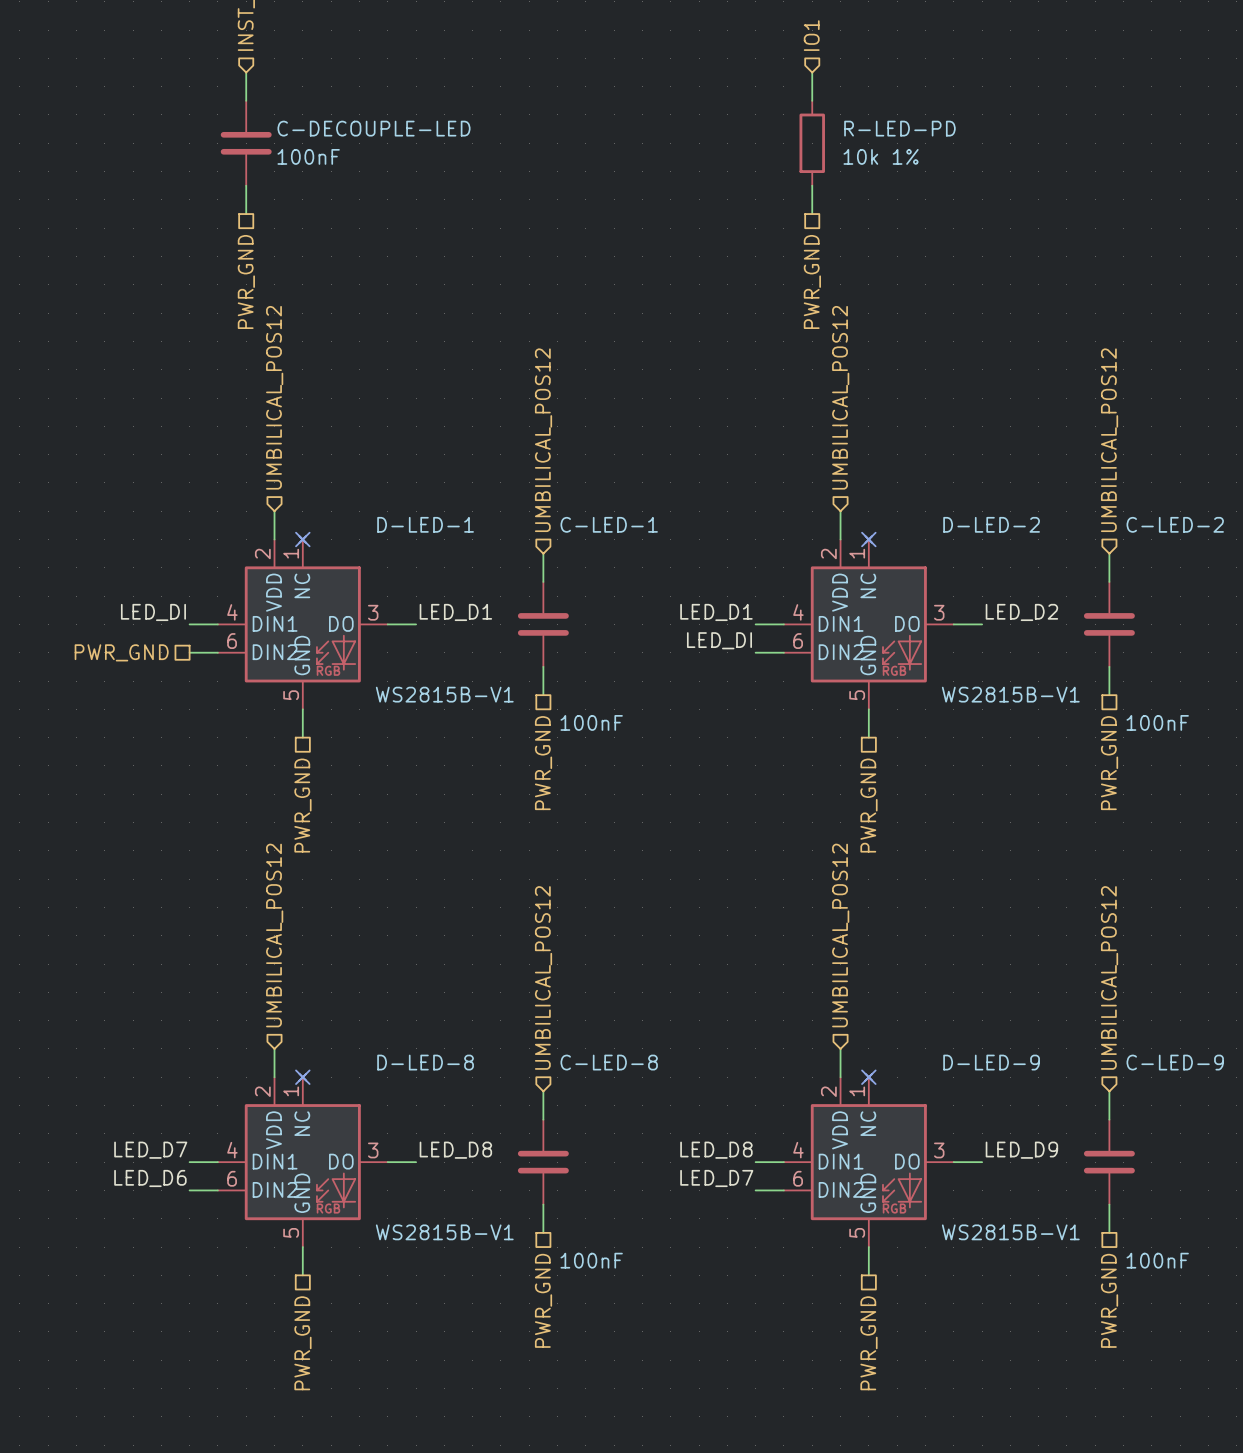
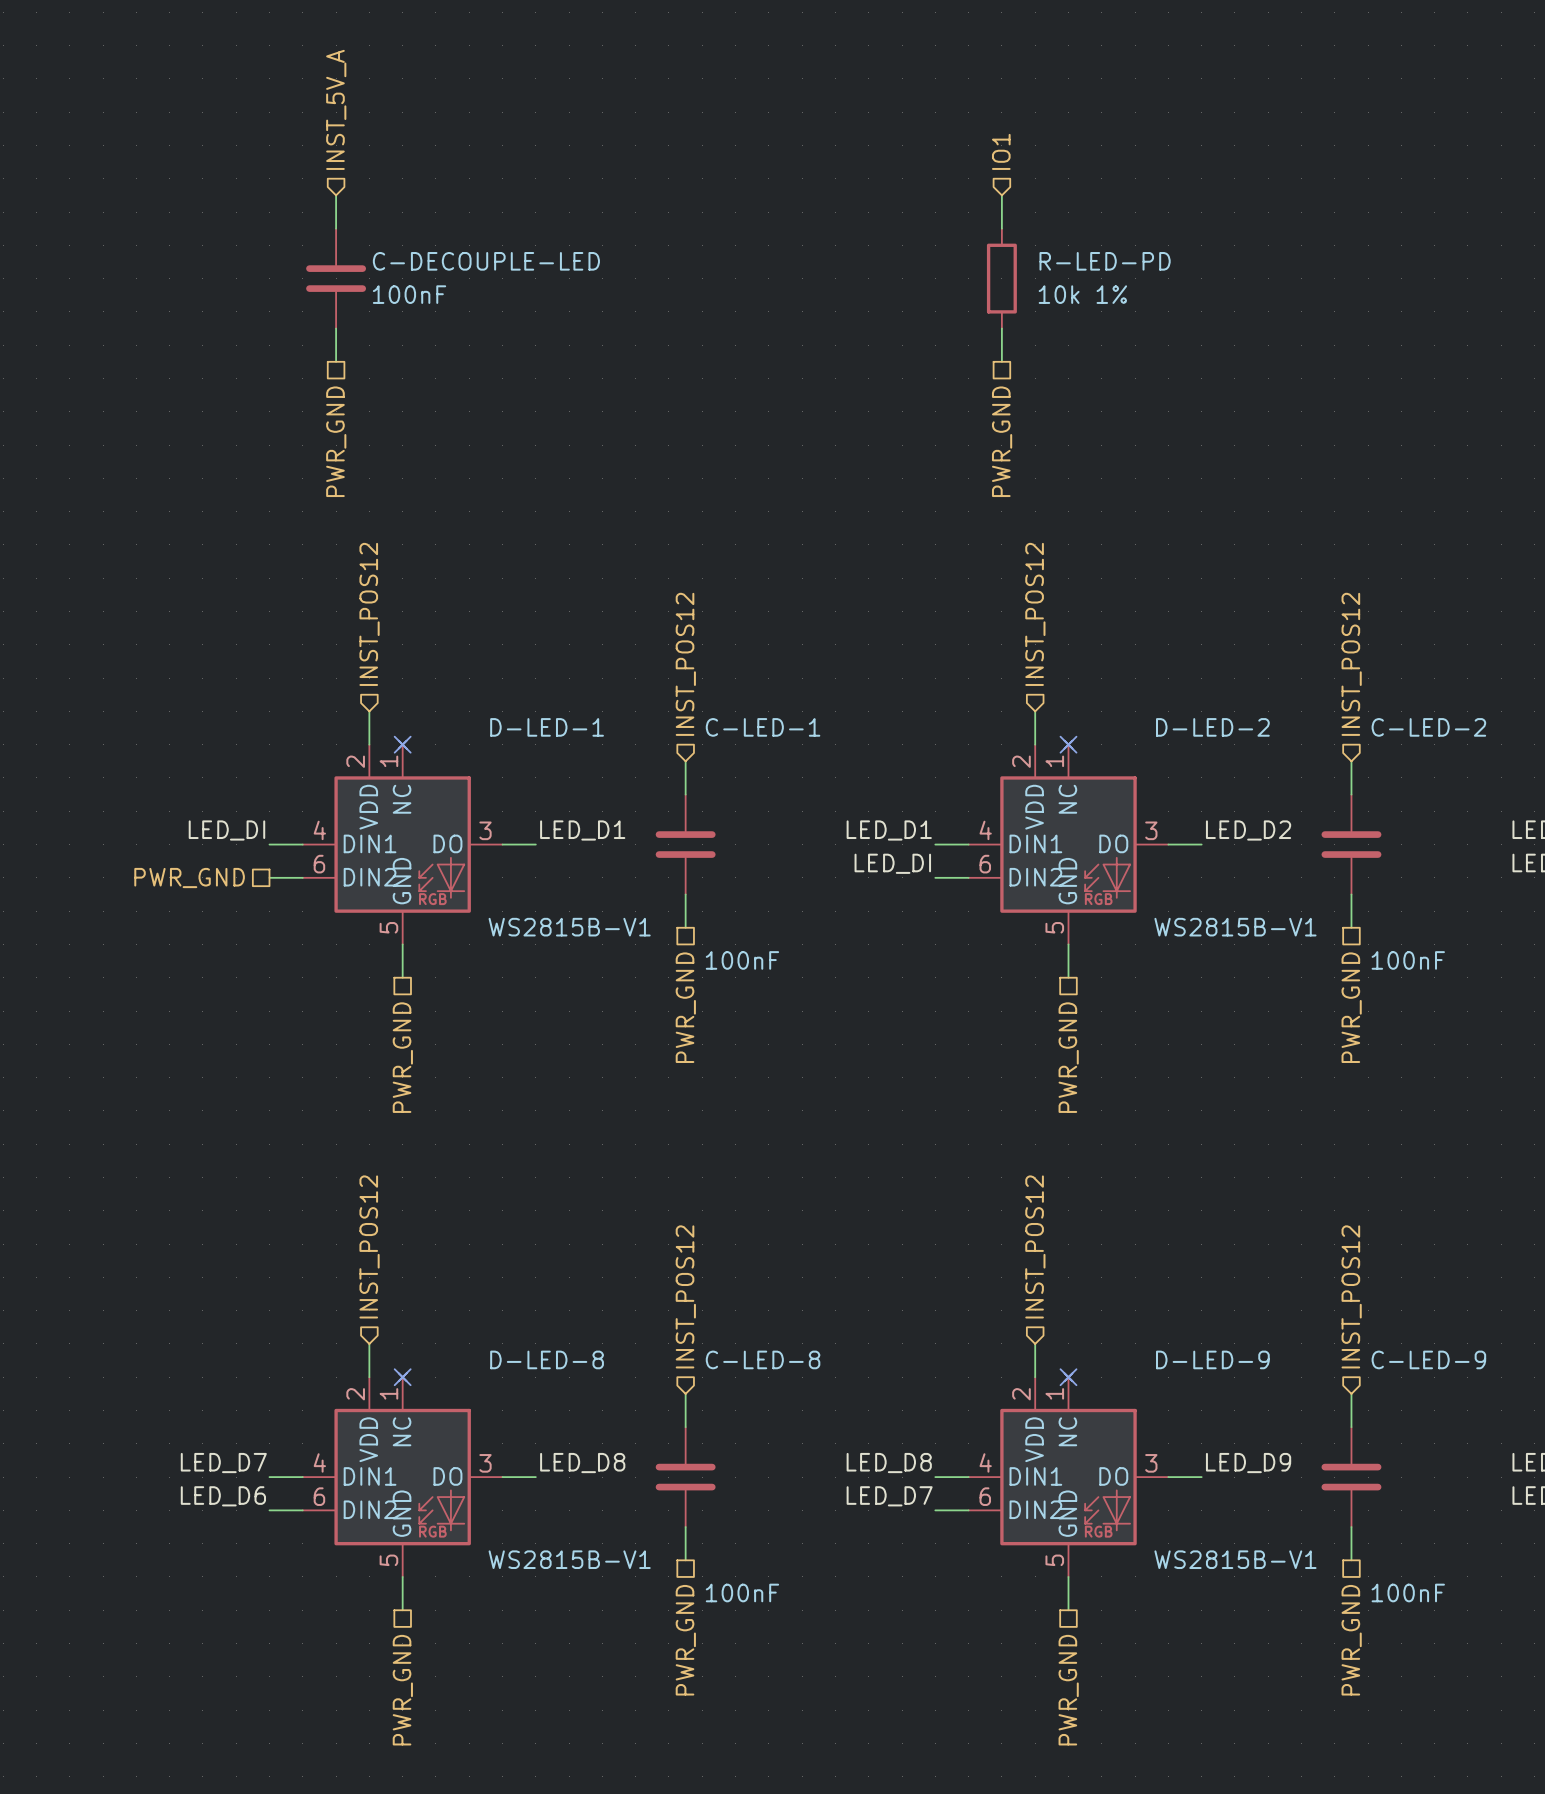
hierarchical label: UMBILICAL_POS12 (274, 397) -> INST_POS12 (369, 614)
hierarchical label: UMBILICAL_POS12 (840, 397) -> INST_POS12 (1035, 614)
hierarchical label: UMBILICAL_POS12 (543, 440) -> INST_POS12 (685, 664)
hierarchical label: UMBILICAL_POS12 (1109, 440) -> INST_POS12 (1351, 664)
hierarchical label: UMBILICAL_POS12 (274, 935) -> INST_POS12 (369, 1246)
hierarchical label: UMBILICAL_POS12 (840, 935) -> INST_POS12 (1035, 1246)
hierarchical label: UMBILICAL_POS12 (543, 977) -> INST_POS12 (685, 1296)
hierarchical label: UMBILICAL_POS12 (1109, 977) -> INST_POS12 (1351, 1296)

